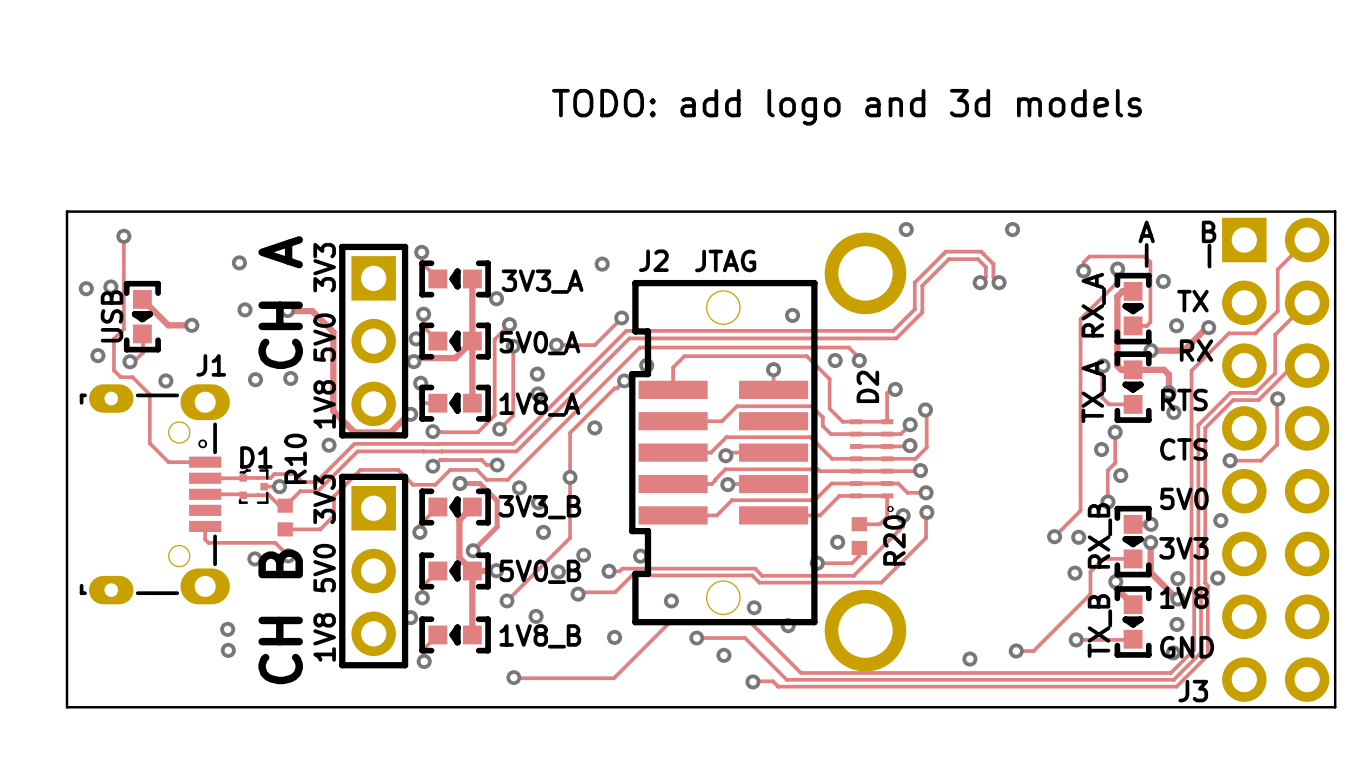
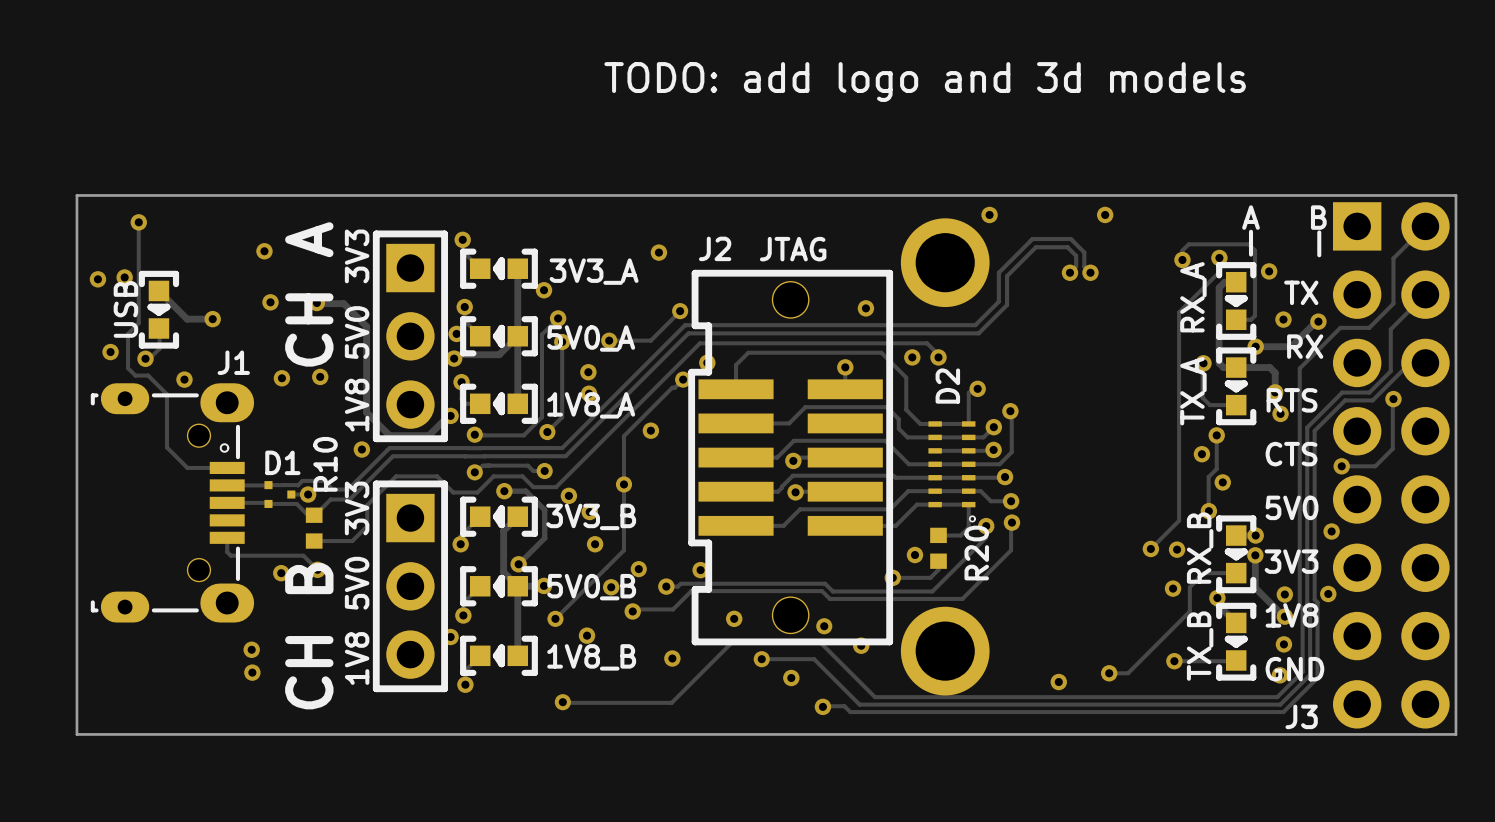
part footprint: [238, 469, 269, 504] -> [264, 481, 296, 508]

